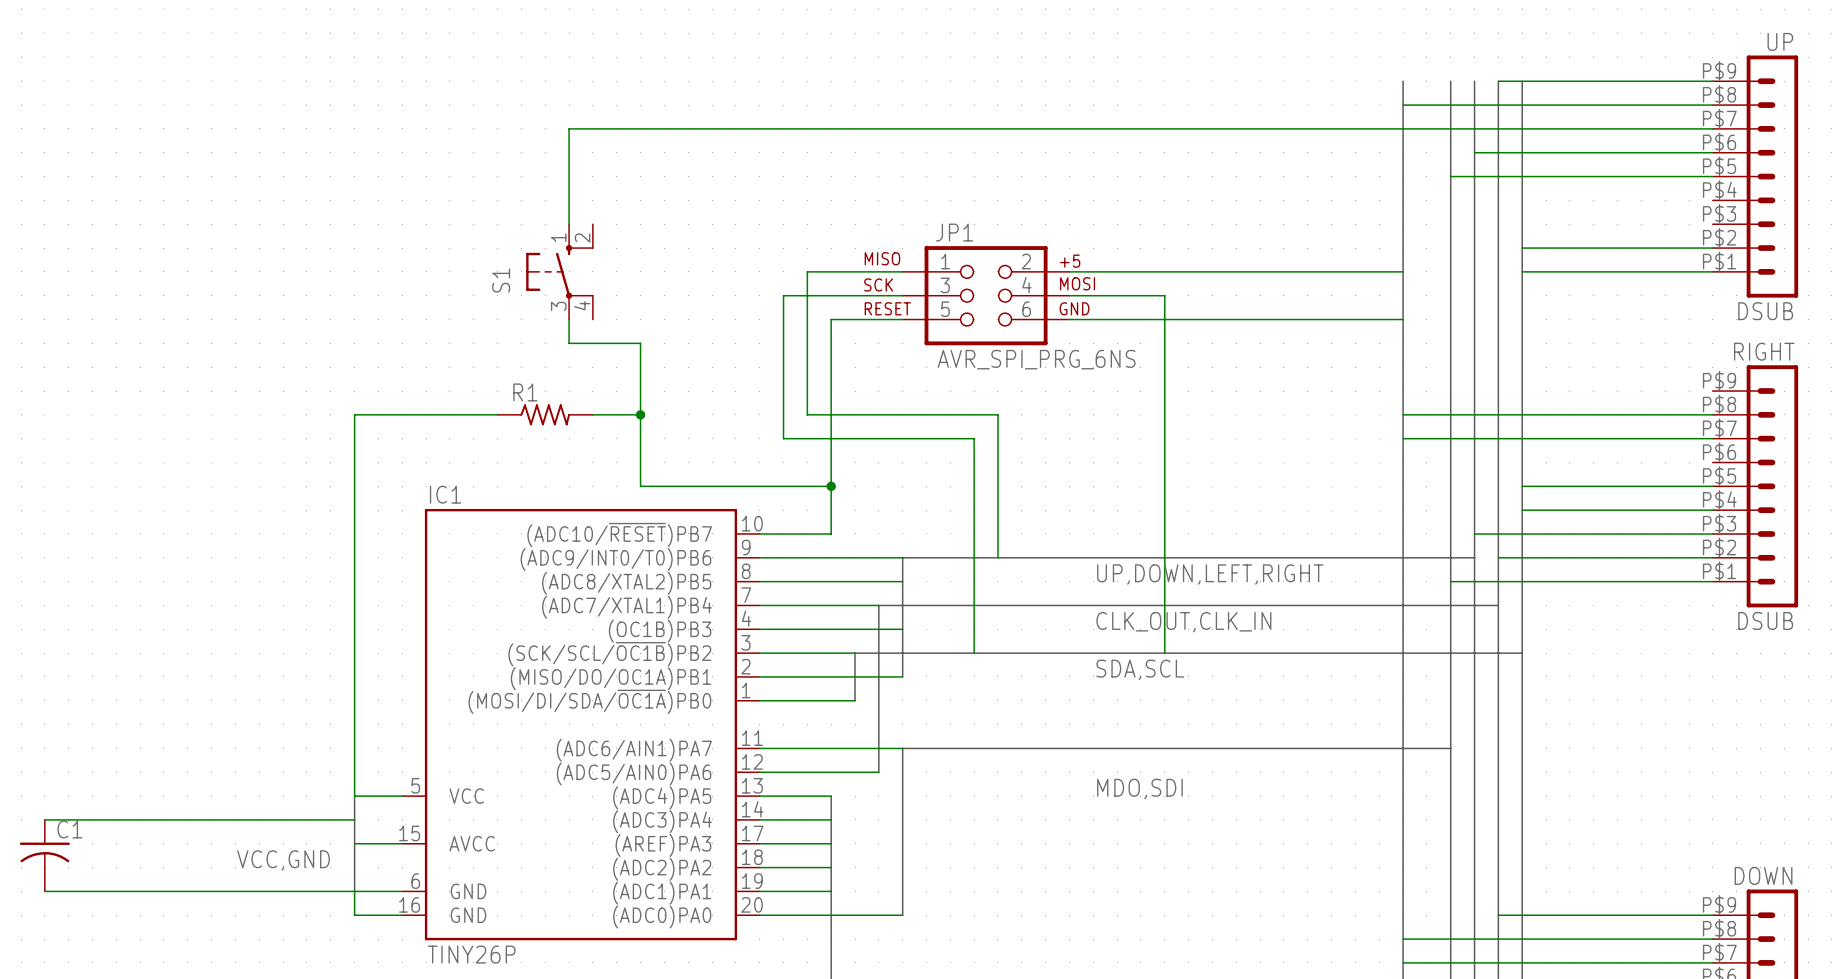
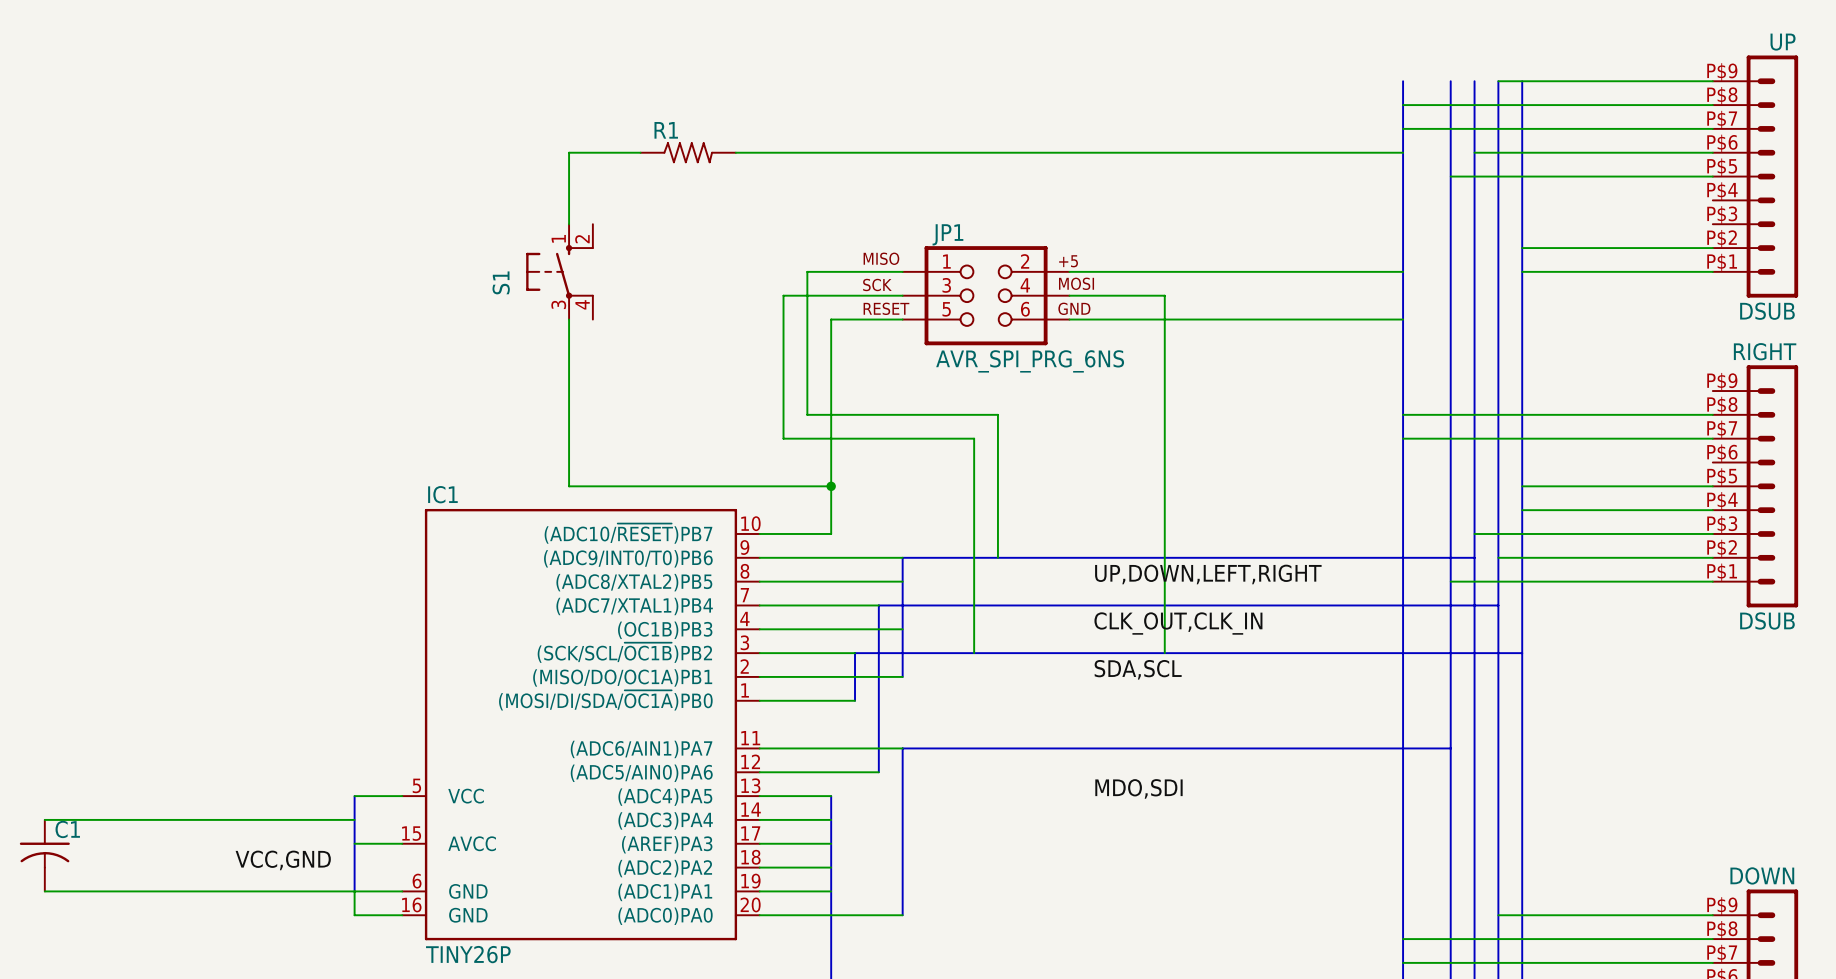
wire: (1403, 128) (569, 128) (569, 152) -> (640, 152) (569, 152)
wire: none -> (735, 152) (1403, 152)
wire: (569, 343) (640, 343) (640, 486) -> (569, 343) (569, 486) (640, 486)
wire: (497, 414) (354, 414) (354, 796) -> none
R1 position: (545, 414) -> (688, 152)
wire: (592, 414) (640, 414) -> none
junction: (640, 414) -> none

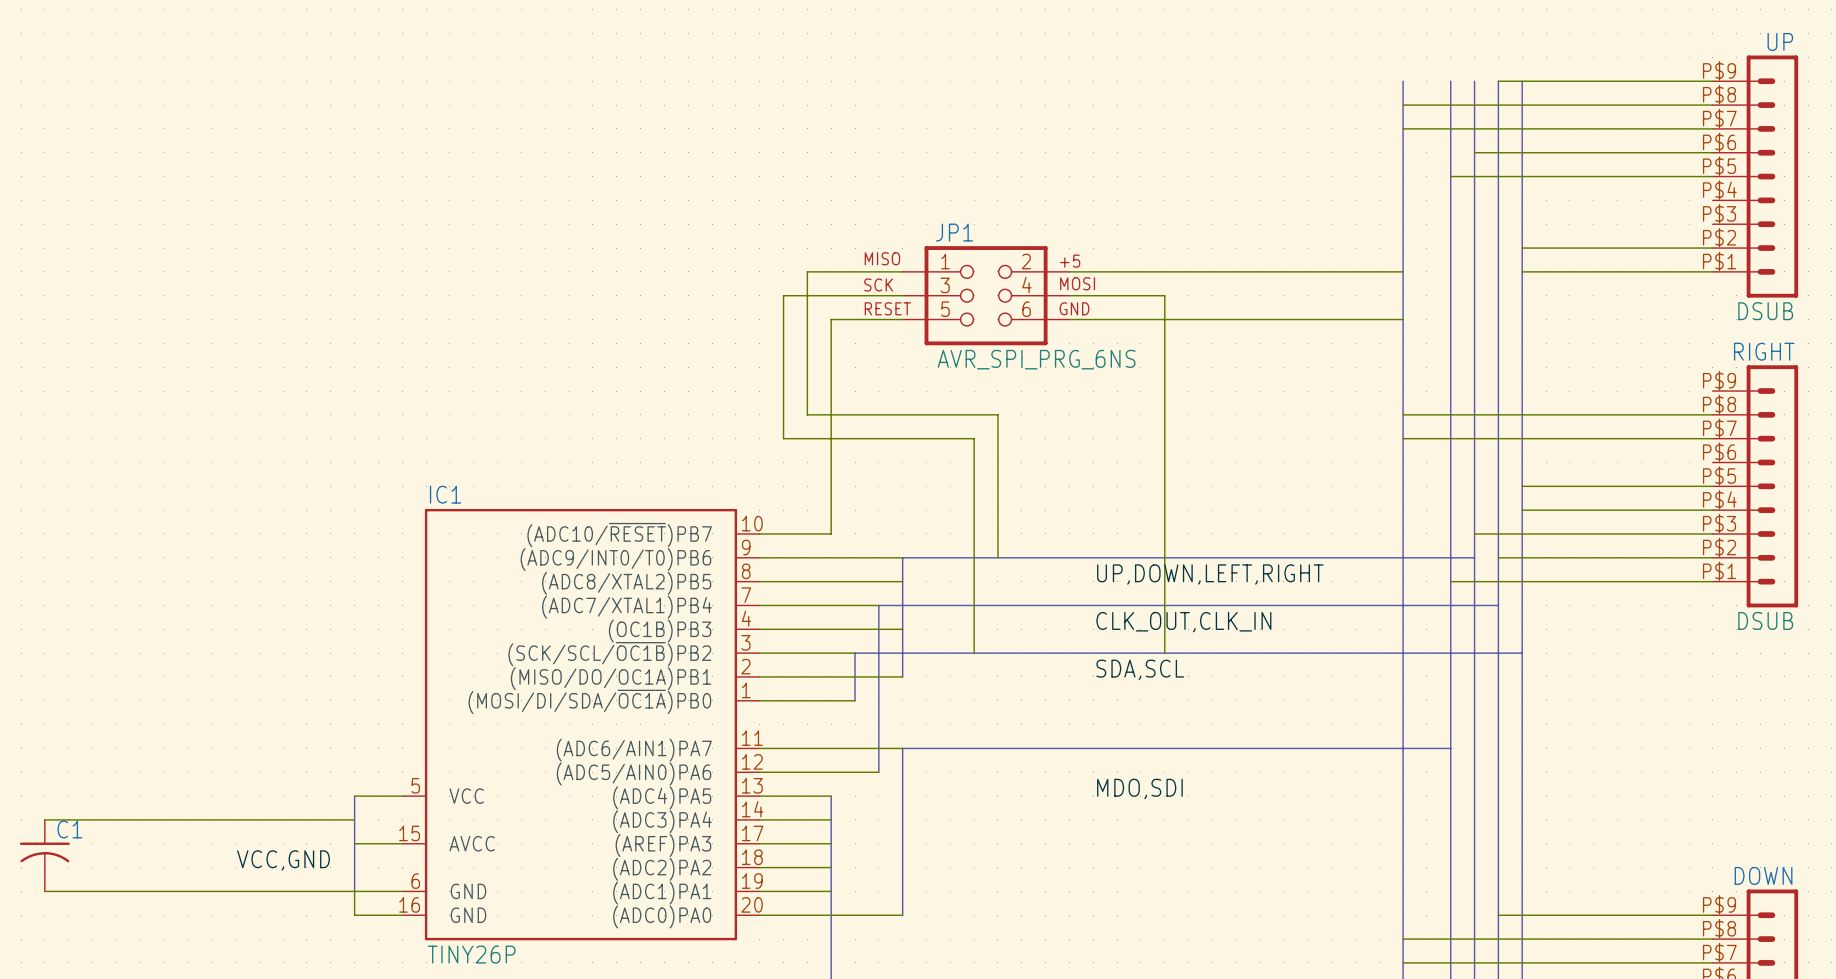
wire: (640, 152) (569, 152) (569, 224) -> none
R1: (688, 152) -> none
wire: (735, 152) (1403, 152) -> none
S1: (559, 271) -> none
wire: (569, 319) (569, 486) (831, 486) -> none
junction: (831, 486) -> none

